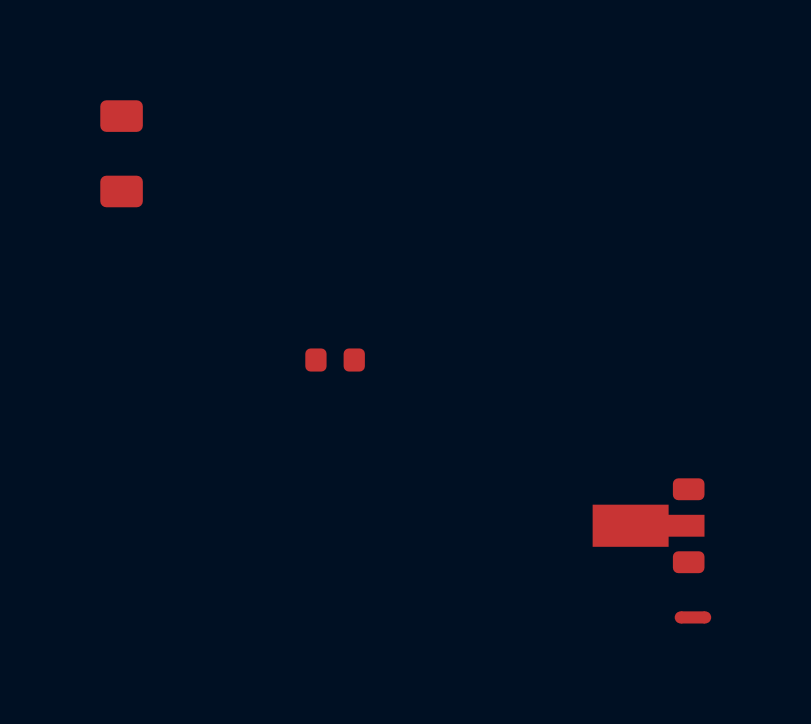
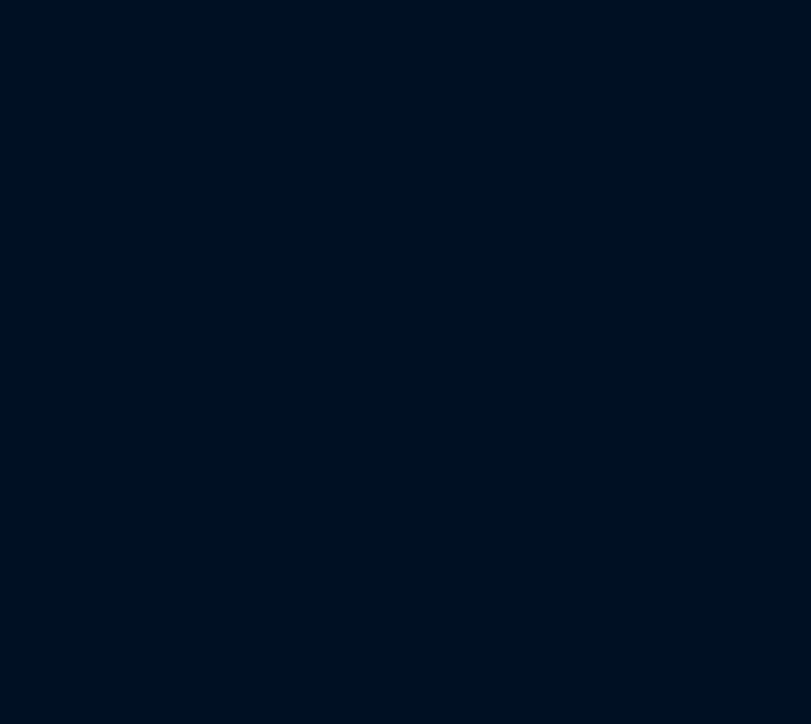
part: (121, 153) -> none
part: (335, 360) -> none
part: (648, 525) -> none
part: (692, 617) -> none

